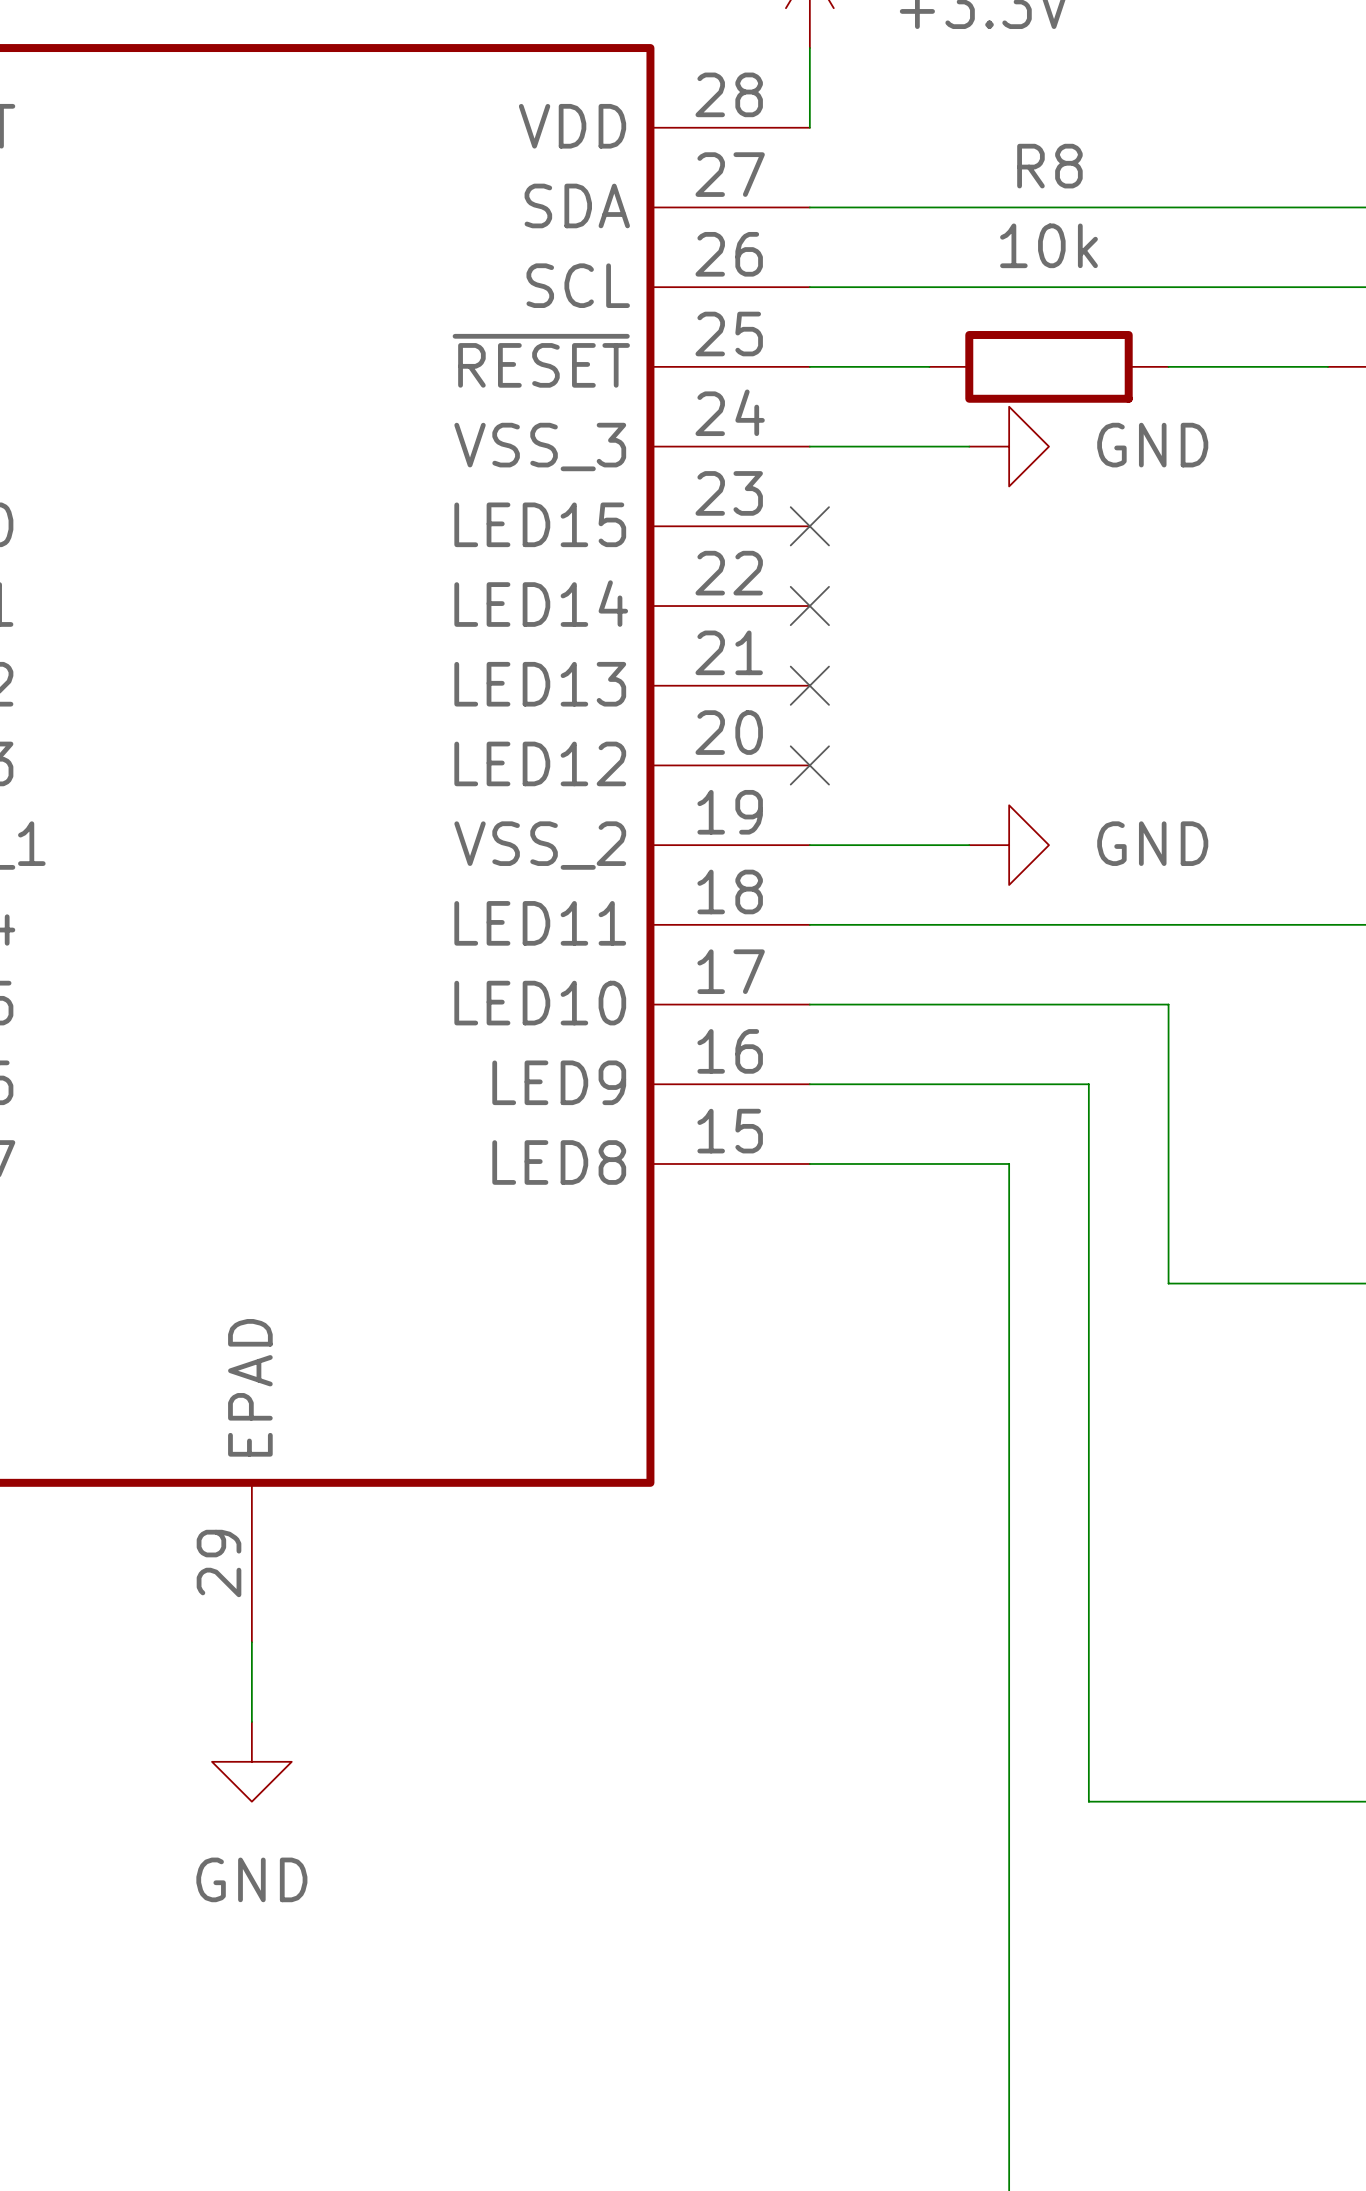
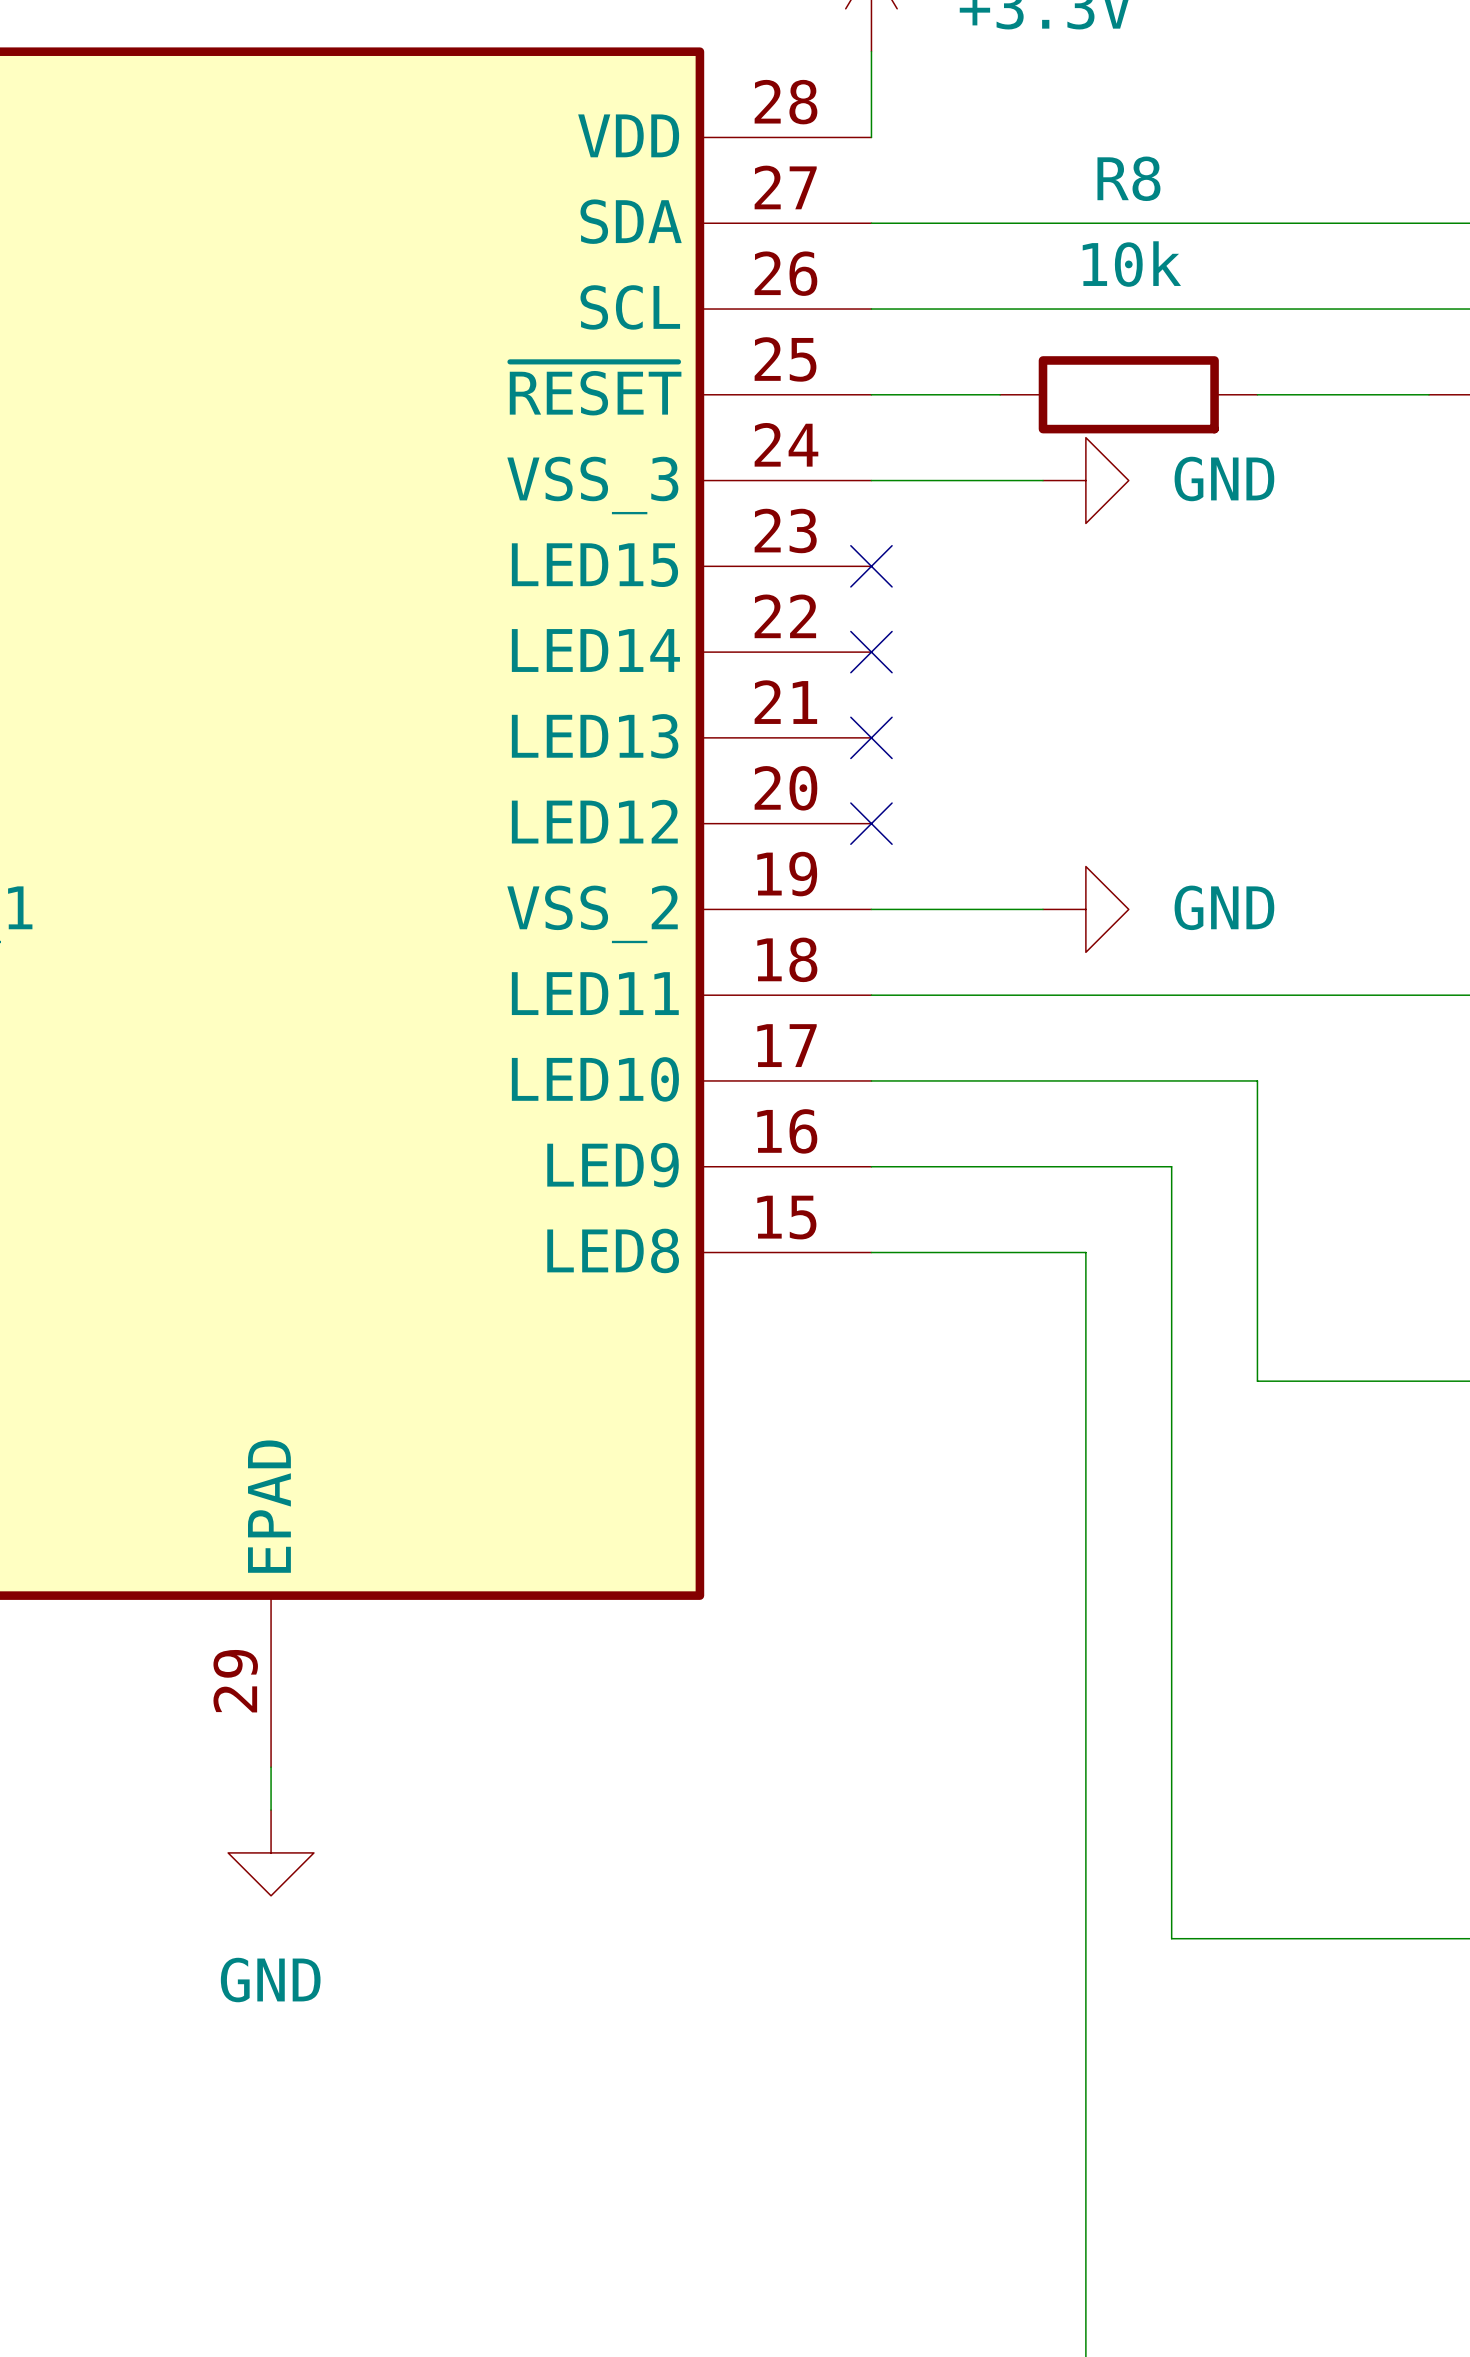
power symbol position: GND (251, 1761) -> GND (271, 1852)

